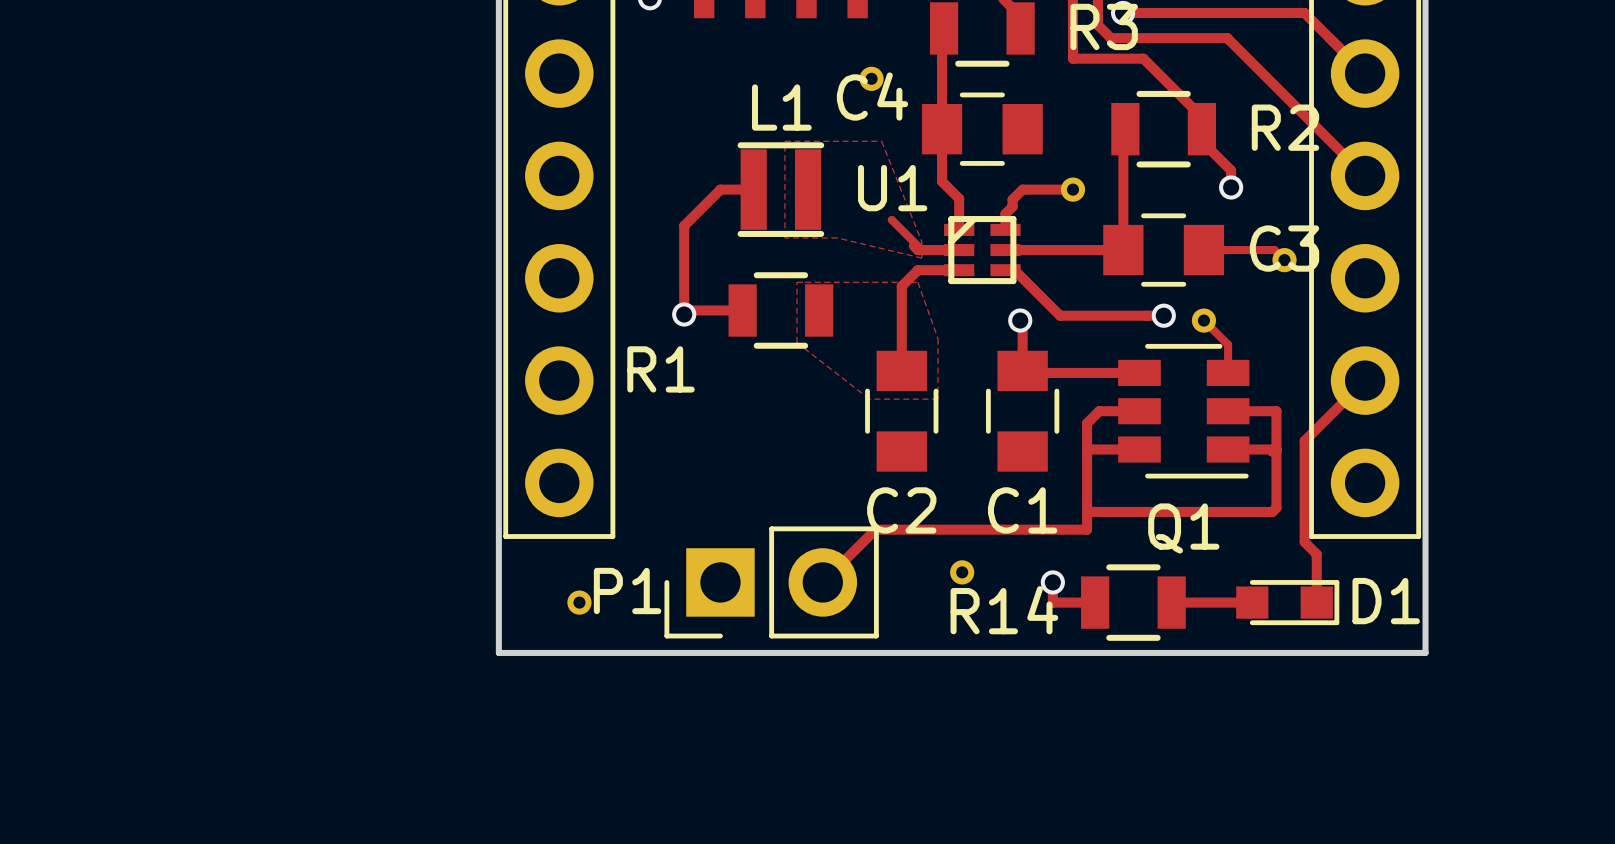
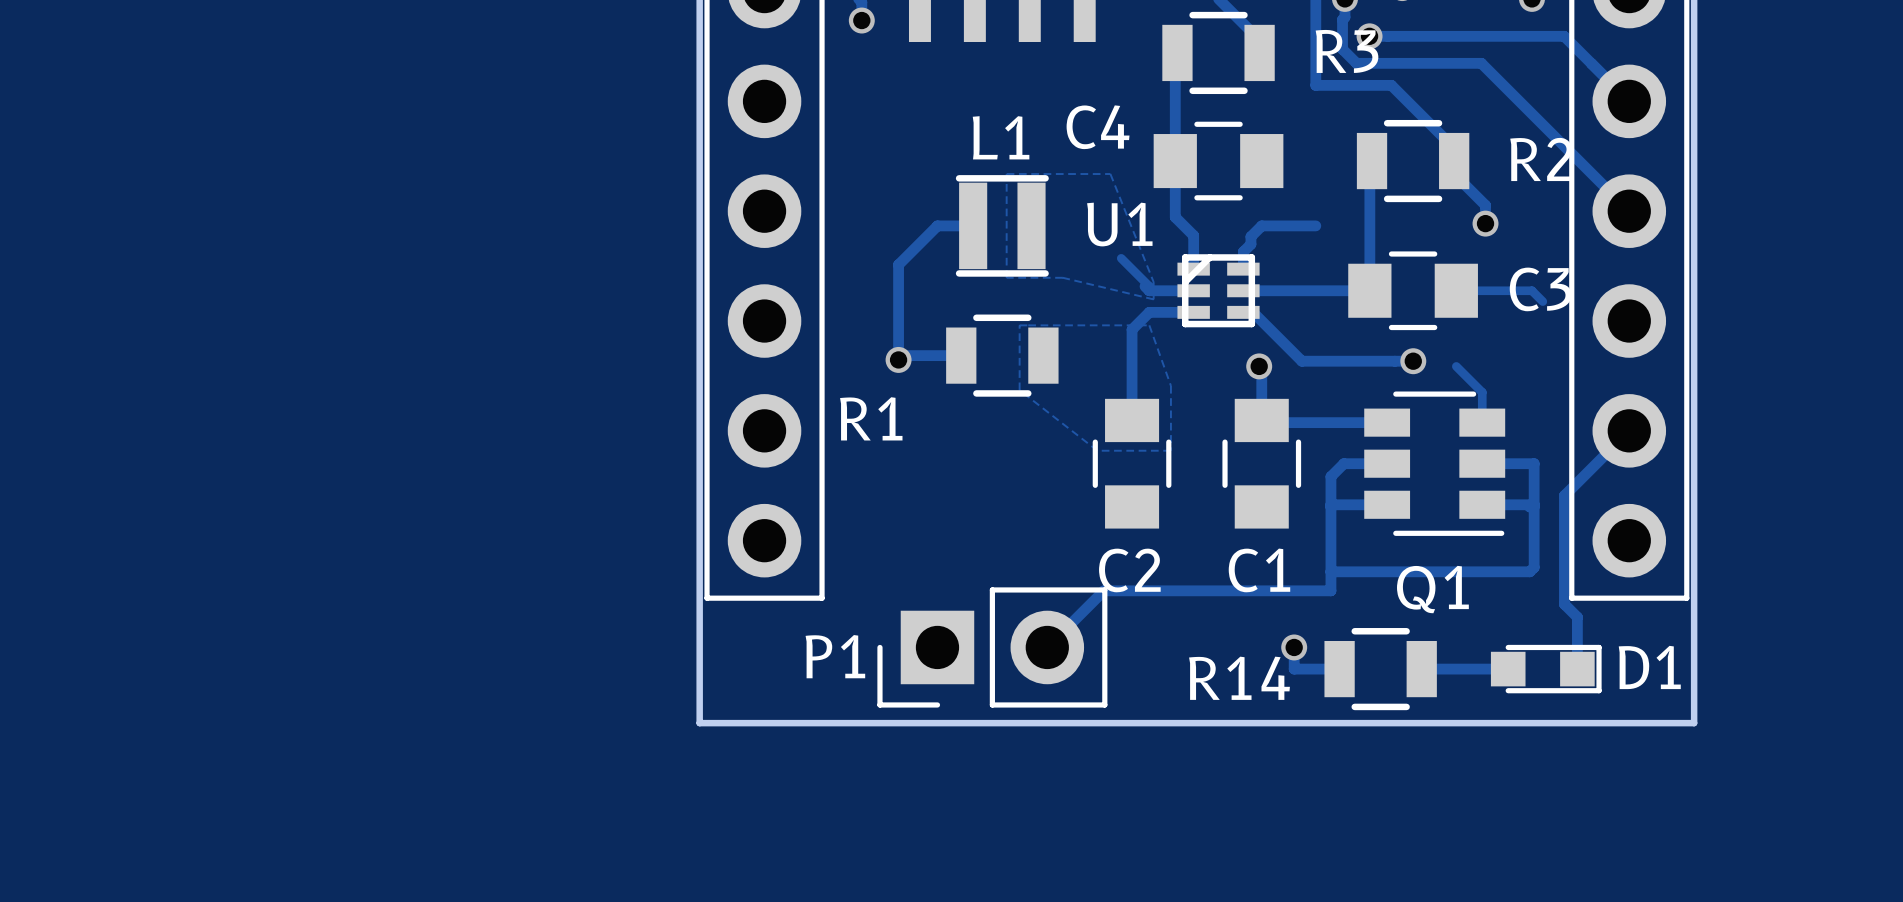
part: (871, 78) -> none
part: (1072, 189) -> none
part: (1284, 260) -> none
part: (1203, 320) -> none
part: (962, 572) -> none
part: (579, 602) -> none

